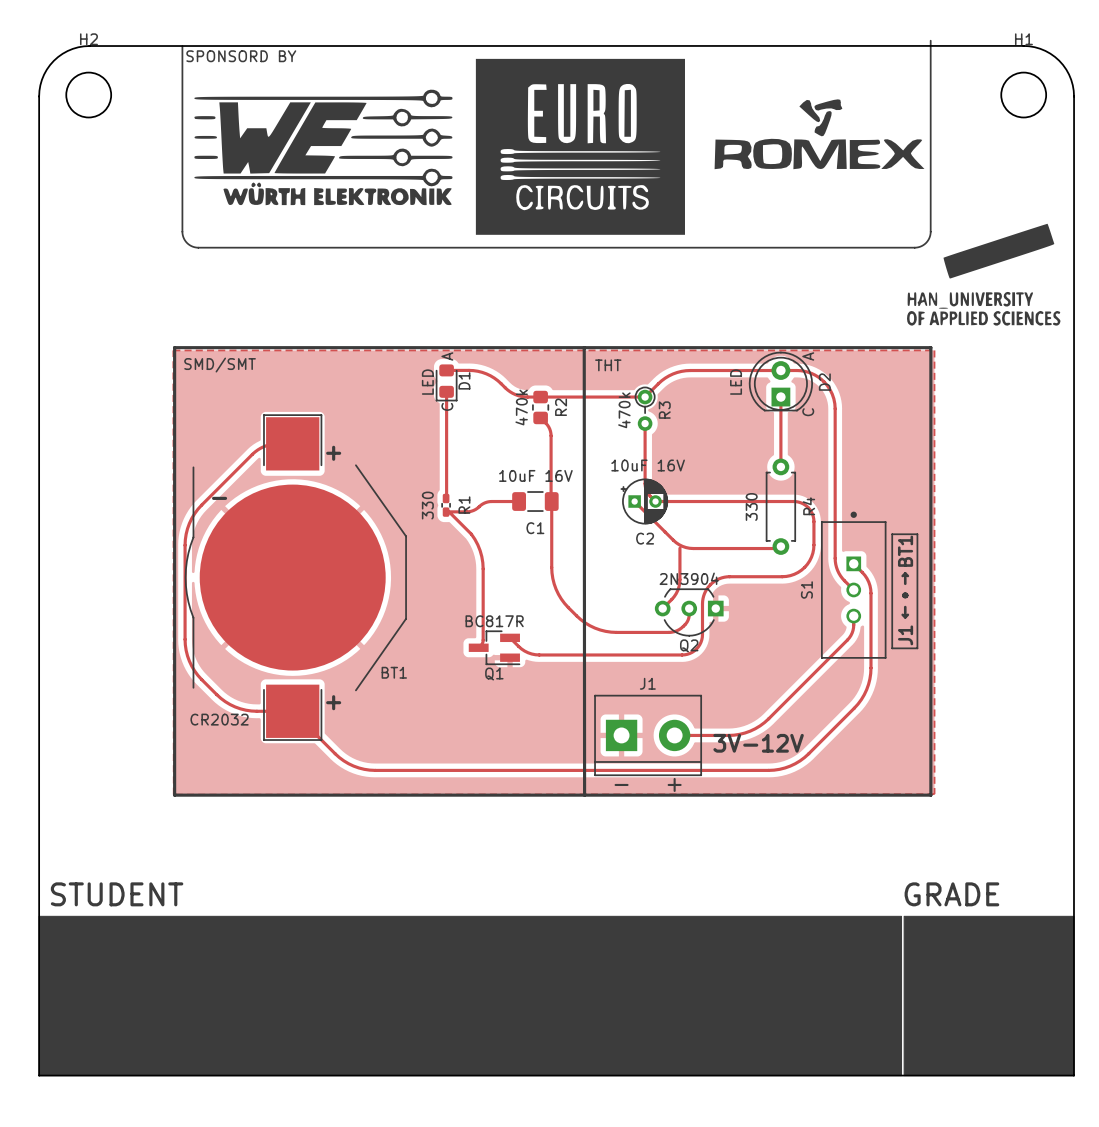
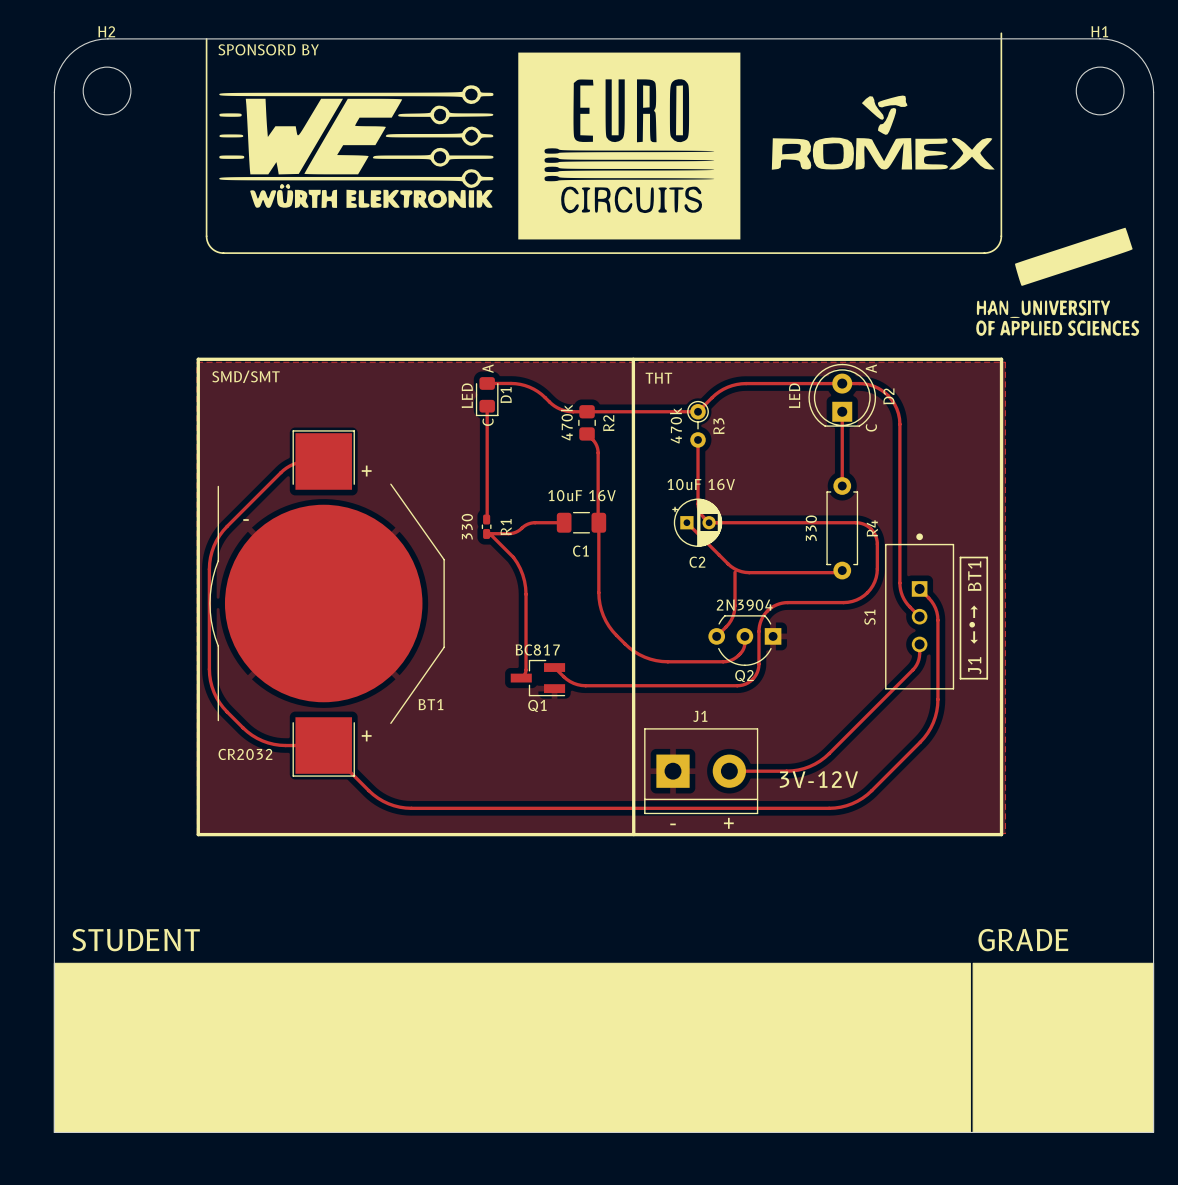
Q1 value: BC817R (494, 621) -> BC817 (537, 649)

